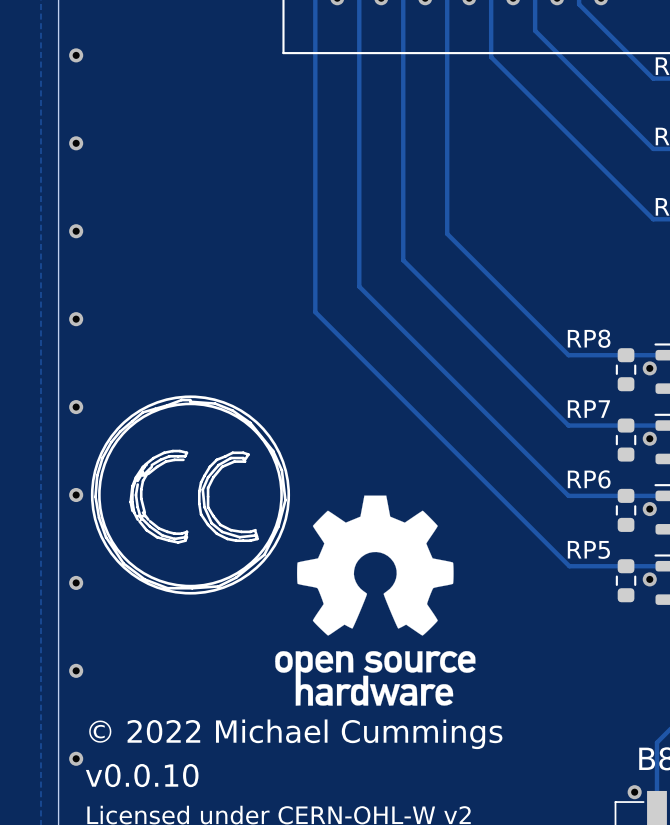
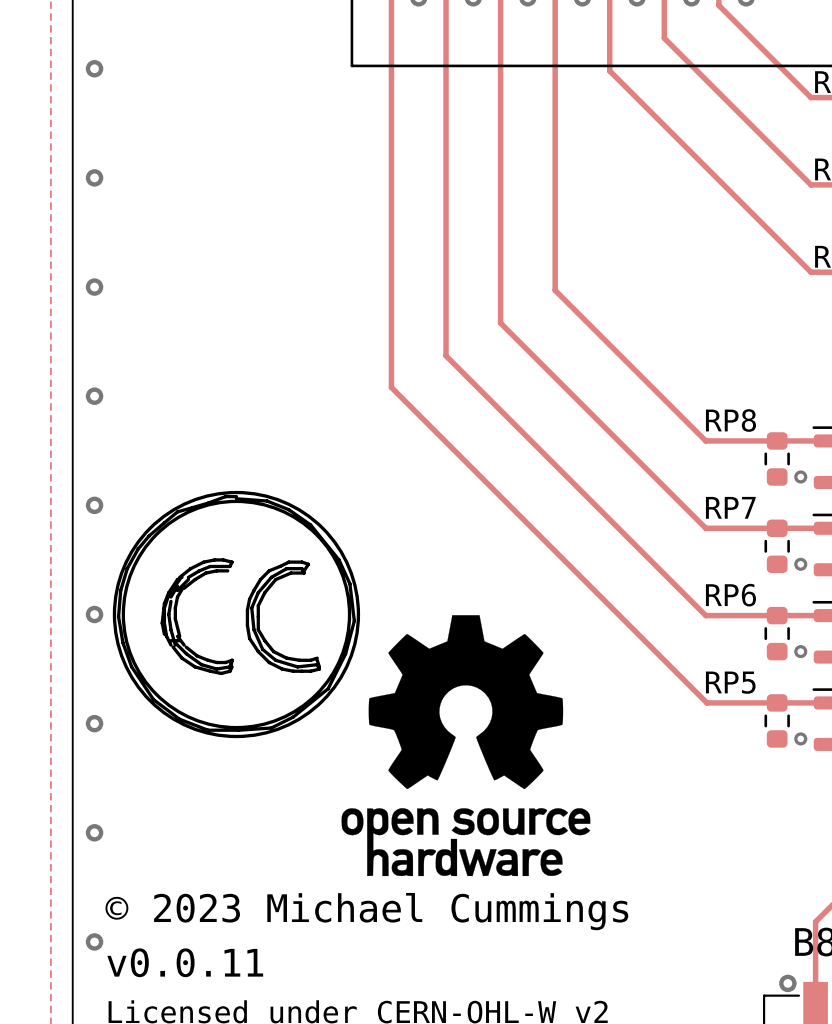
via: (649, 368) -> none
via: none -> (800, 476)
via: (649, 438) -> none
via: none -> (800, 564)
via: (649, 509) -> none
via: none -> (800, 651)
via: (649, 579) -> none
via: none -> (800, 738)
text: © 2022 Michael Cummings (295, 734) -> © 2023 Michael Cummings (366, 911)
text: v0.0.10 (142, 775) -> v0.0.11 (185, 962)

